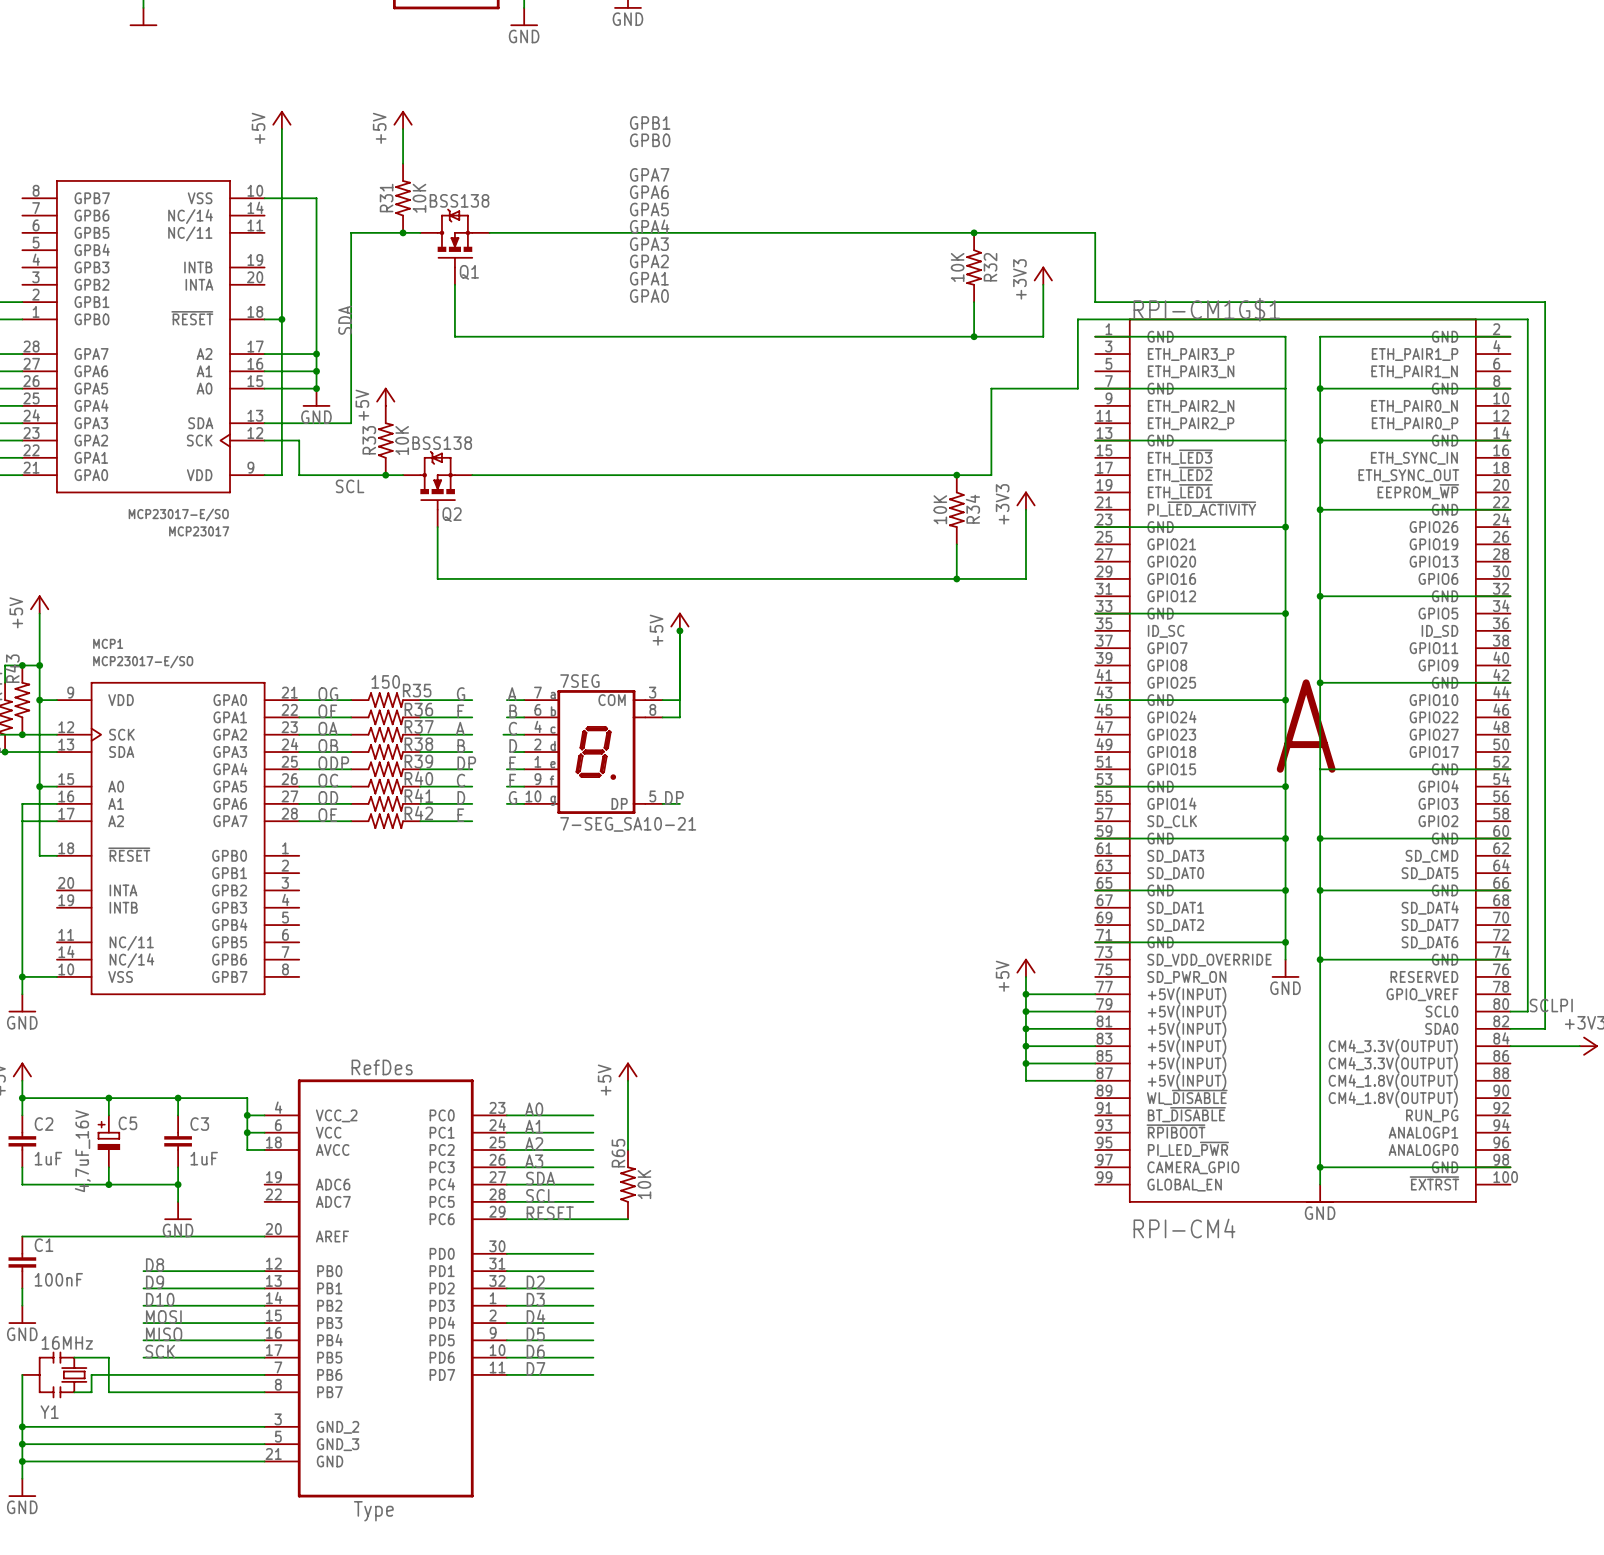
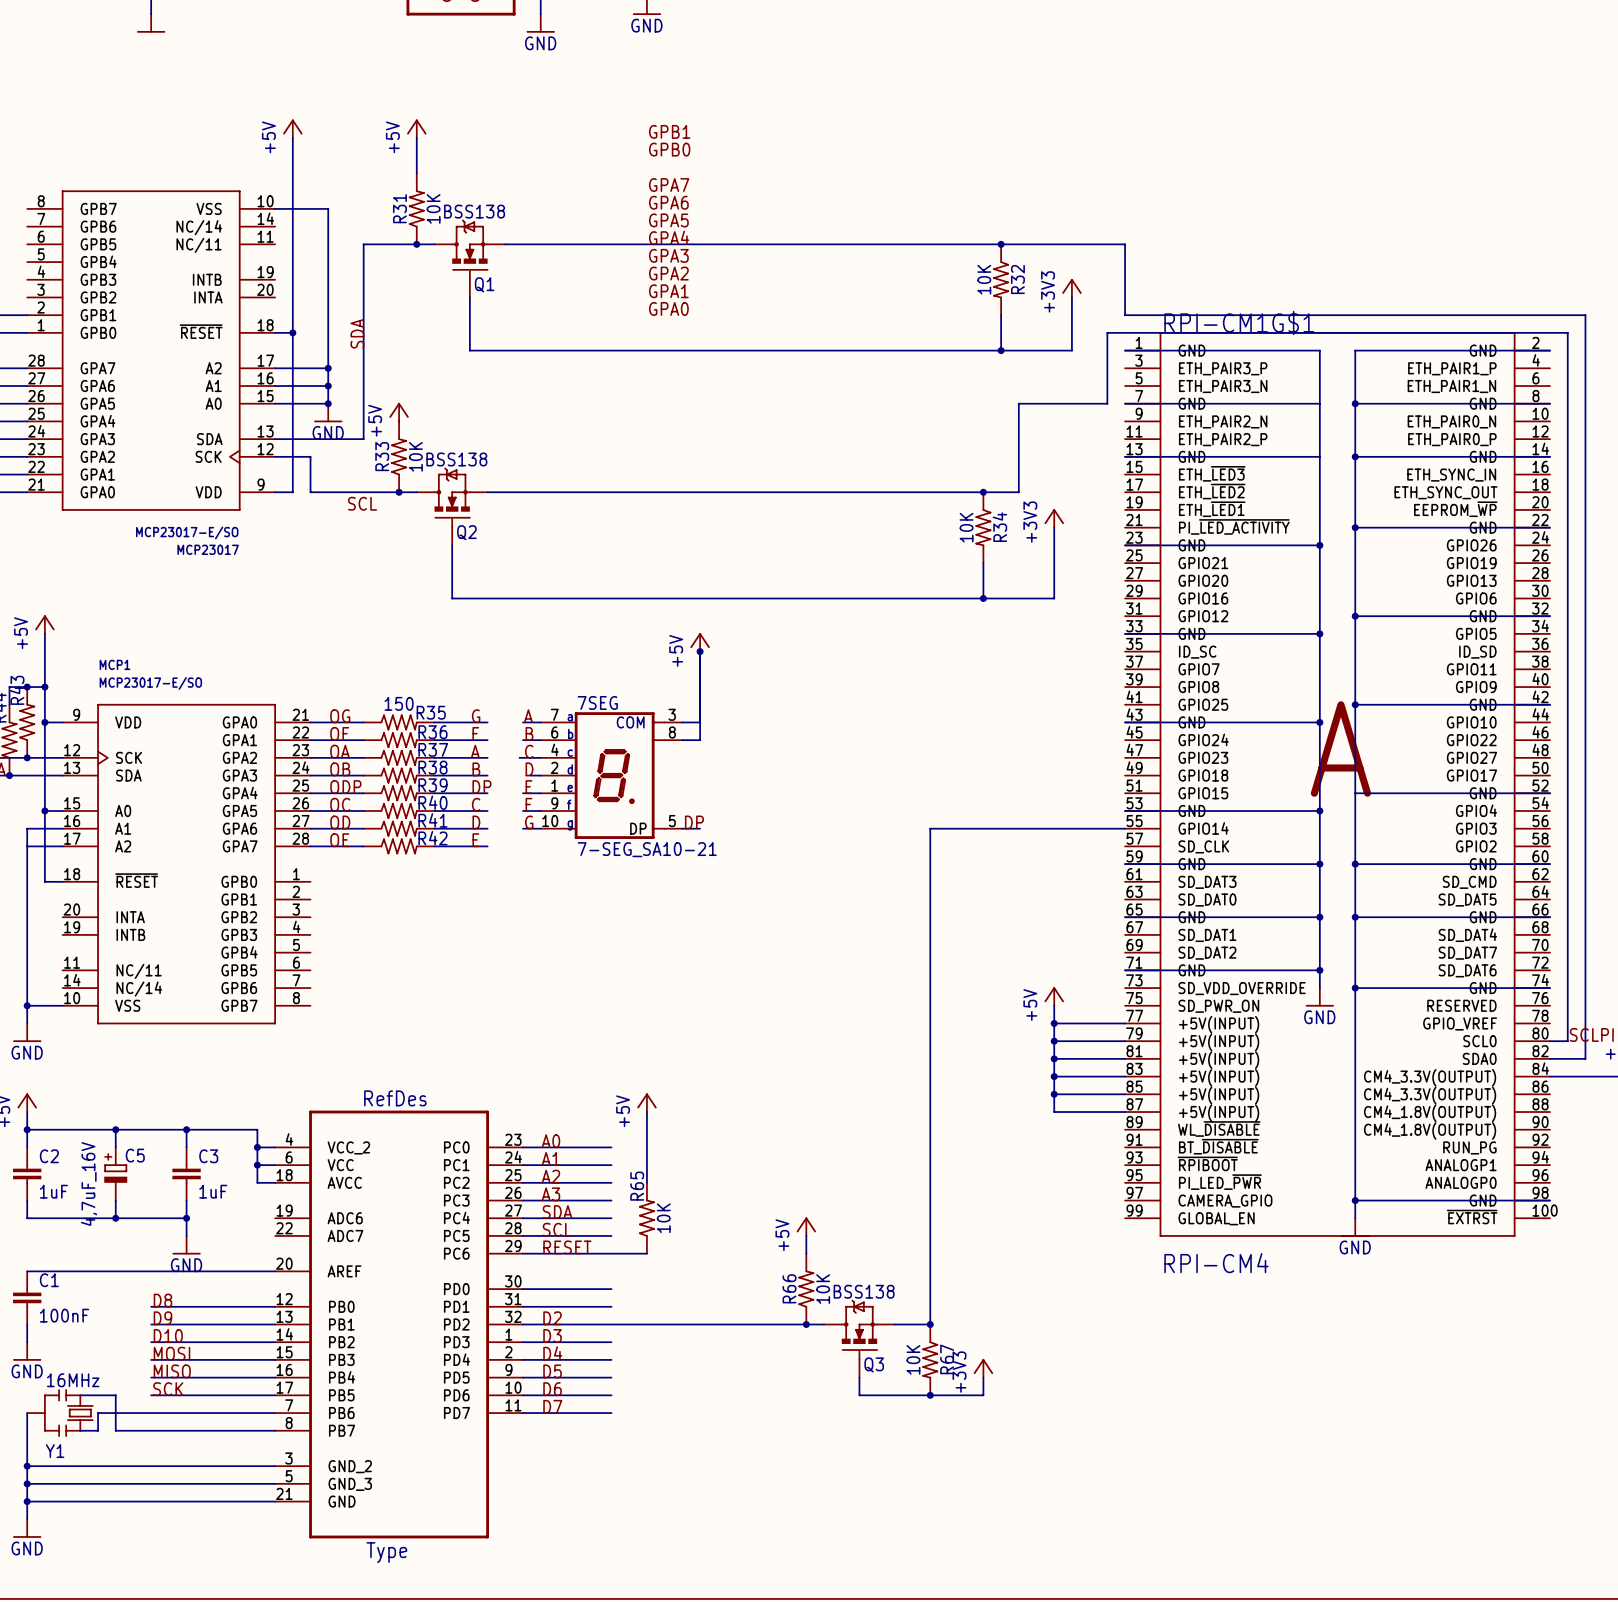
wire: none -> (1125, 828) (930, 828) (930, 1324) (894, 1324)
power symbol: none -> +5V (806, 1226)
wire: none -> (806, 1235) (806, 1253)
R66: none -> 10K (806, 1289)
wire: none -> (611, 1324) (824, 1324)
junction: none -> (806, 1324)
junction: none -> (930, 1324)
Q3: none -> BSS138 (859, 1338)
R67: none -> 10K (930, 1359)
power symbol: none -> +3V3 (983, 1368)
wire: none -> (859, 1377) (859, 1395) (983, 1395) (983, 1377)
junction: none -> (930, 1395)

